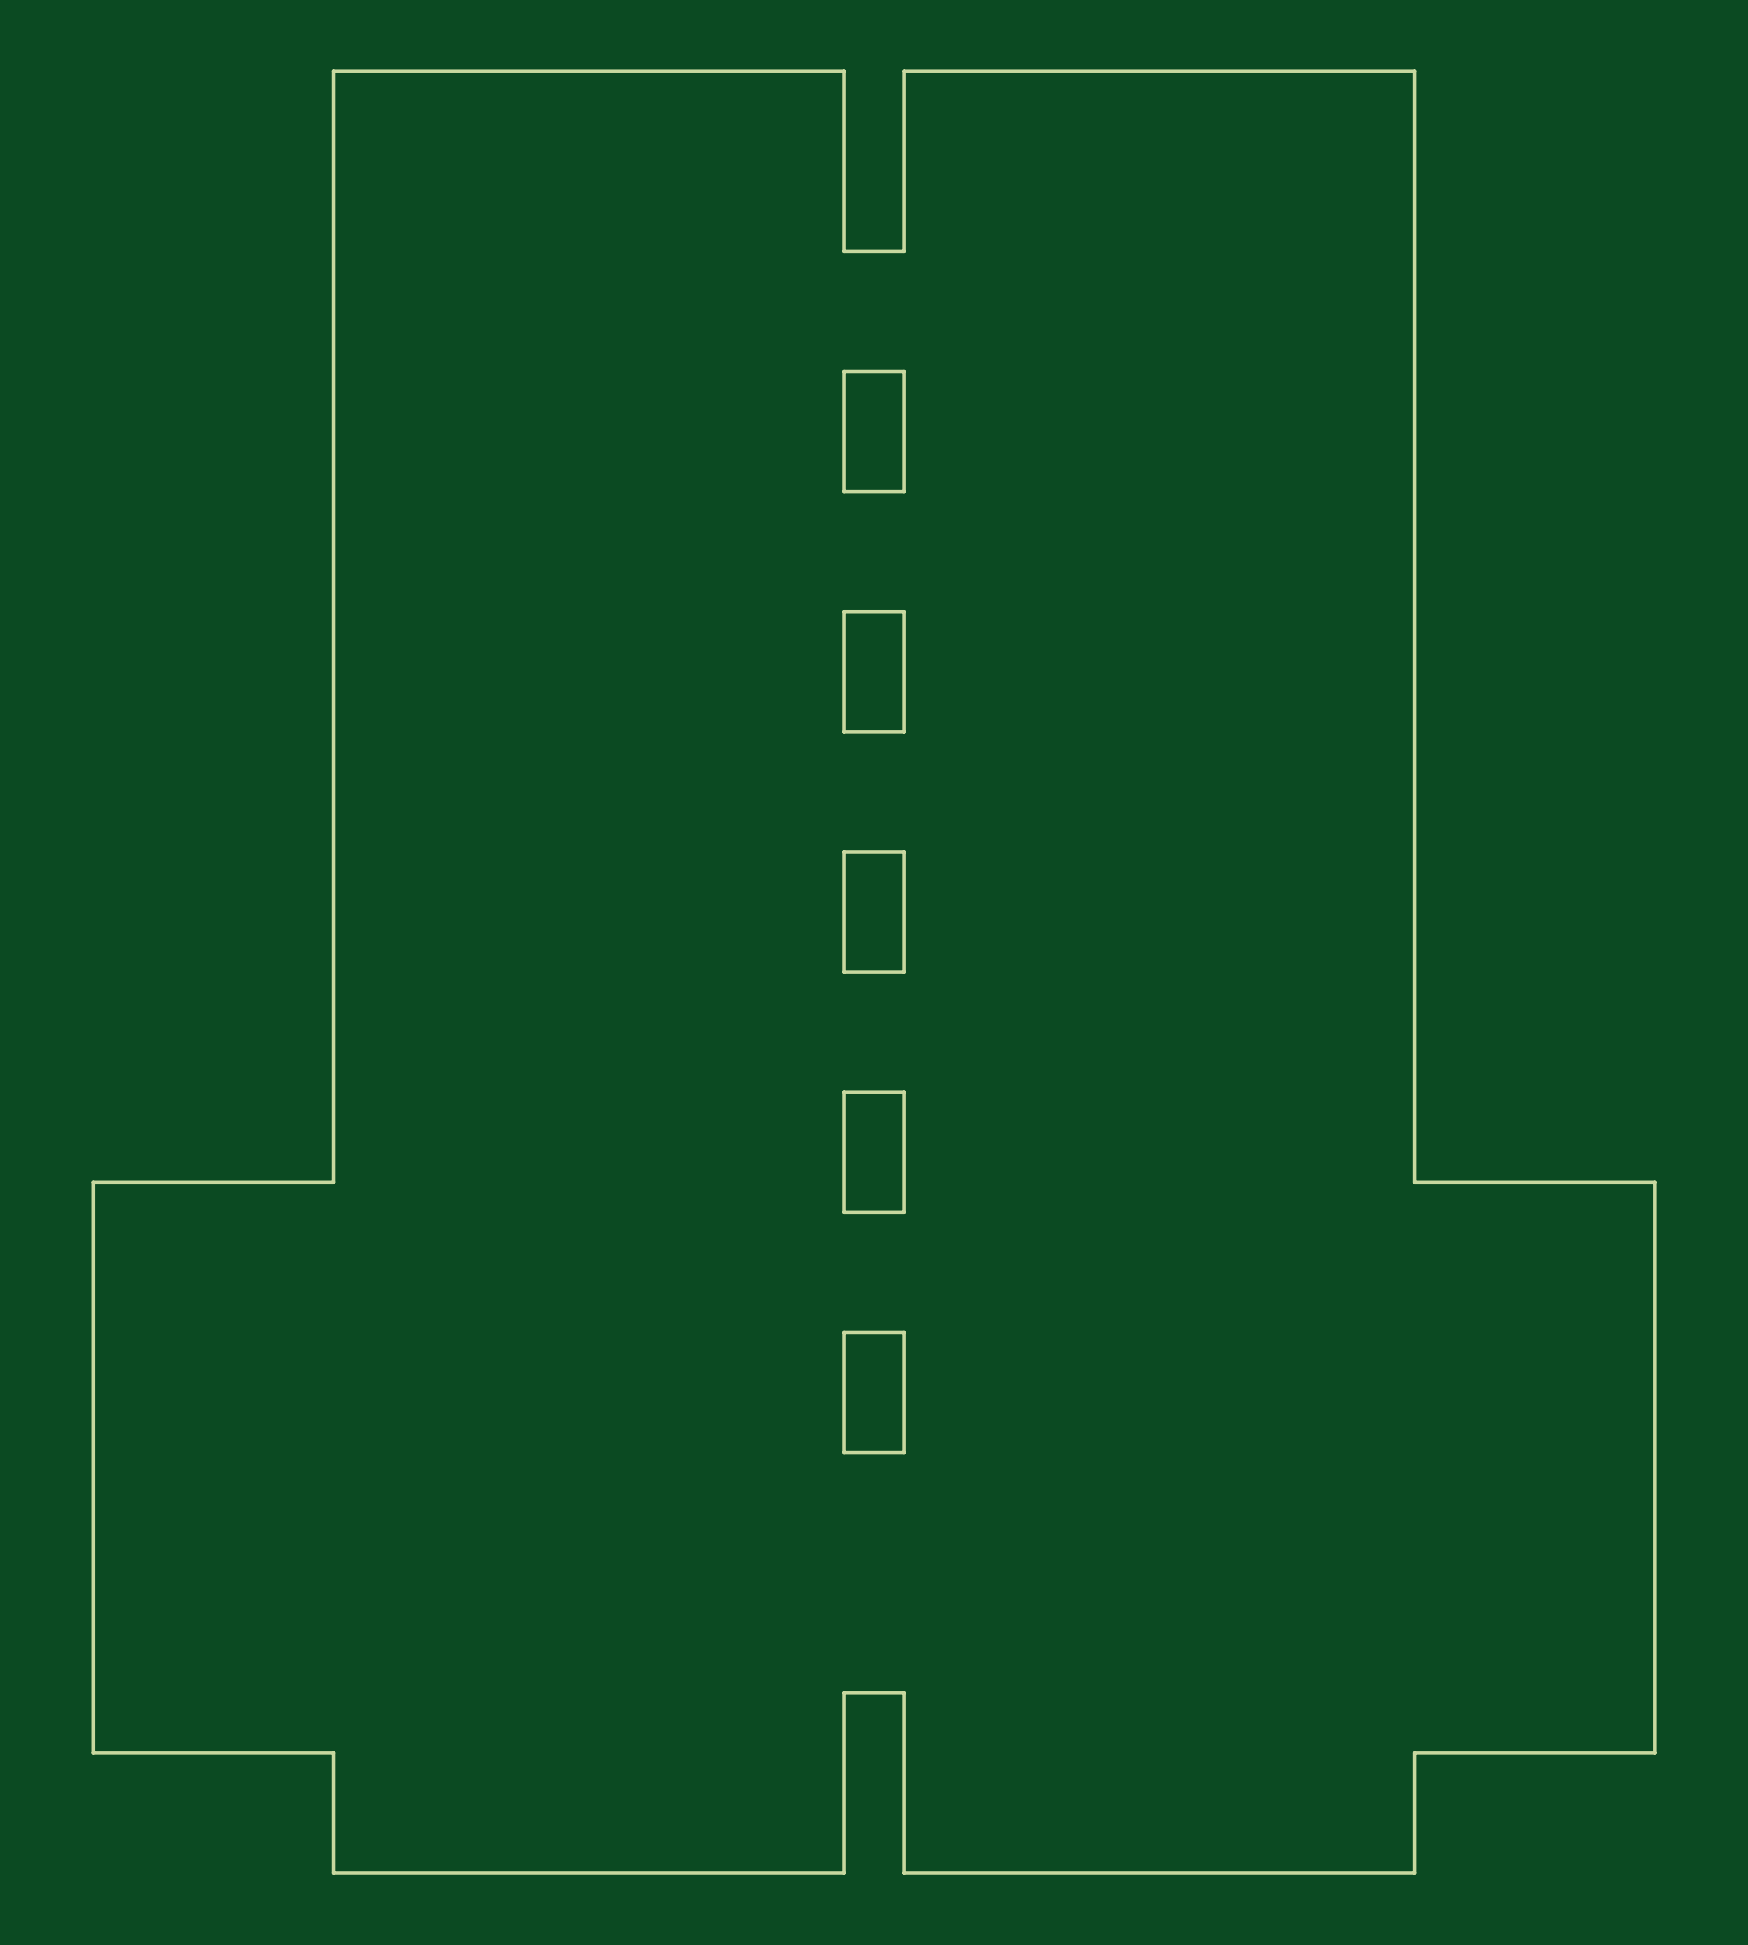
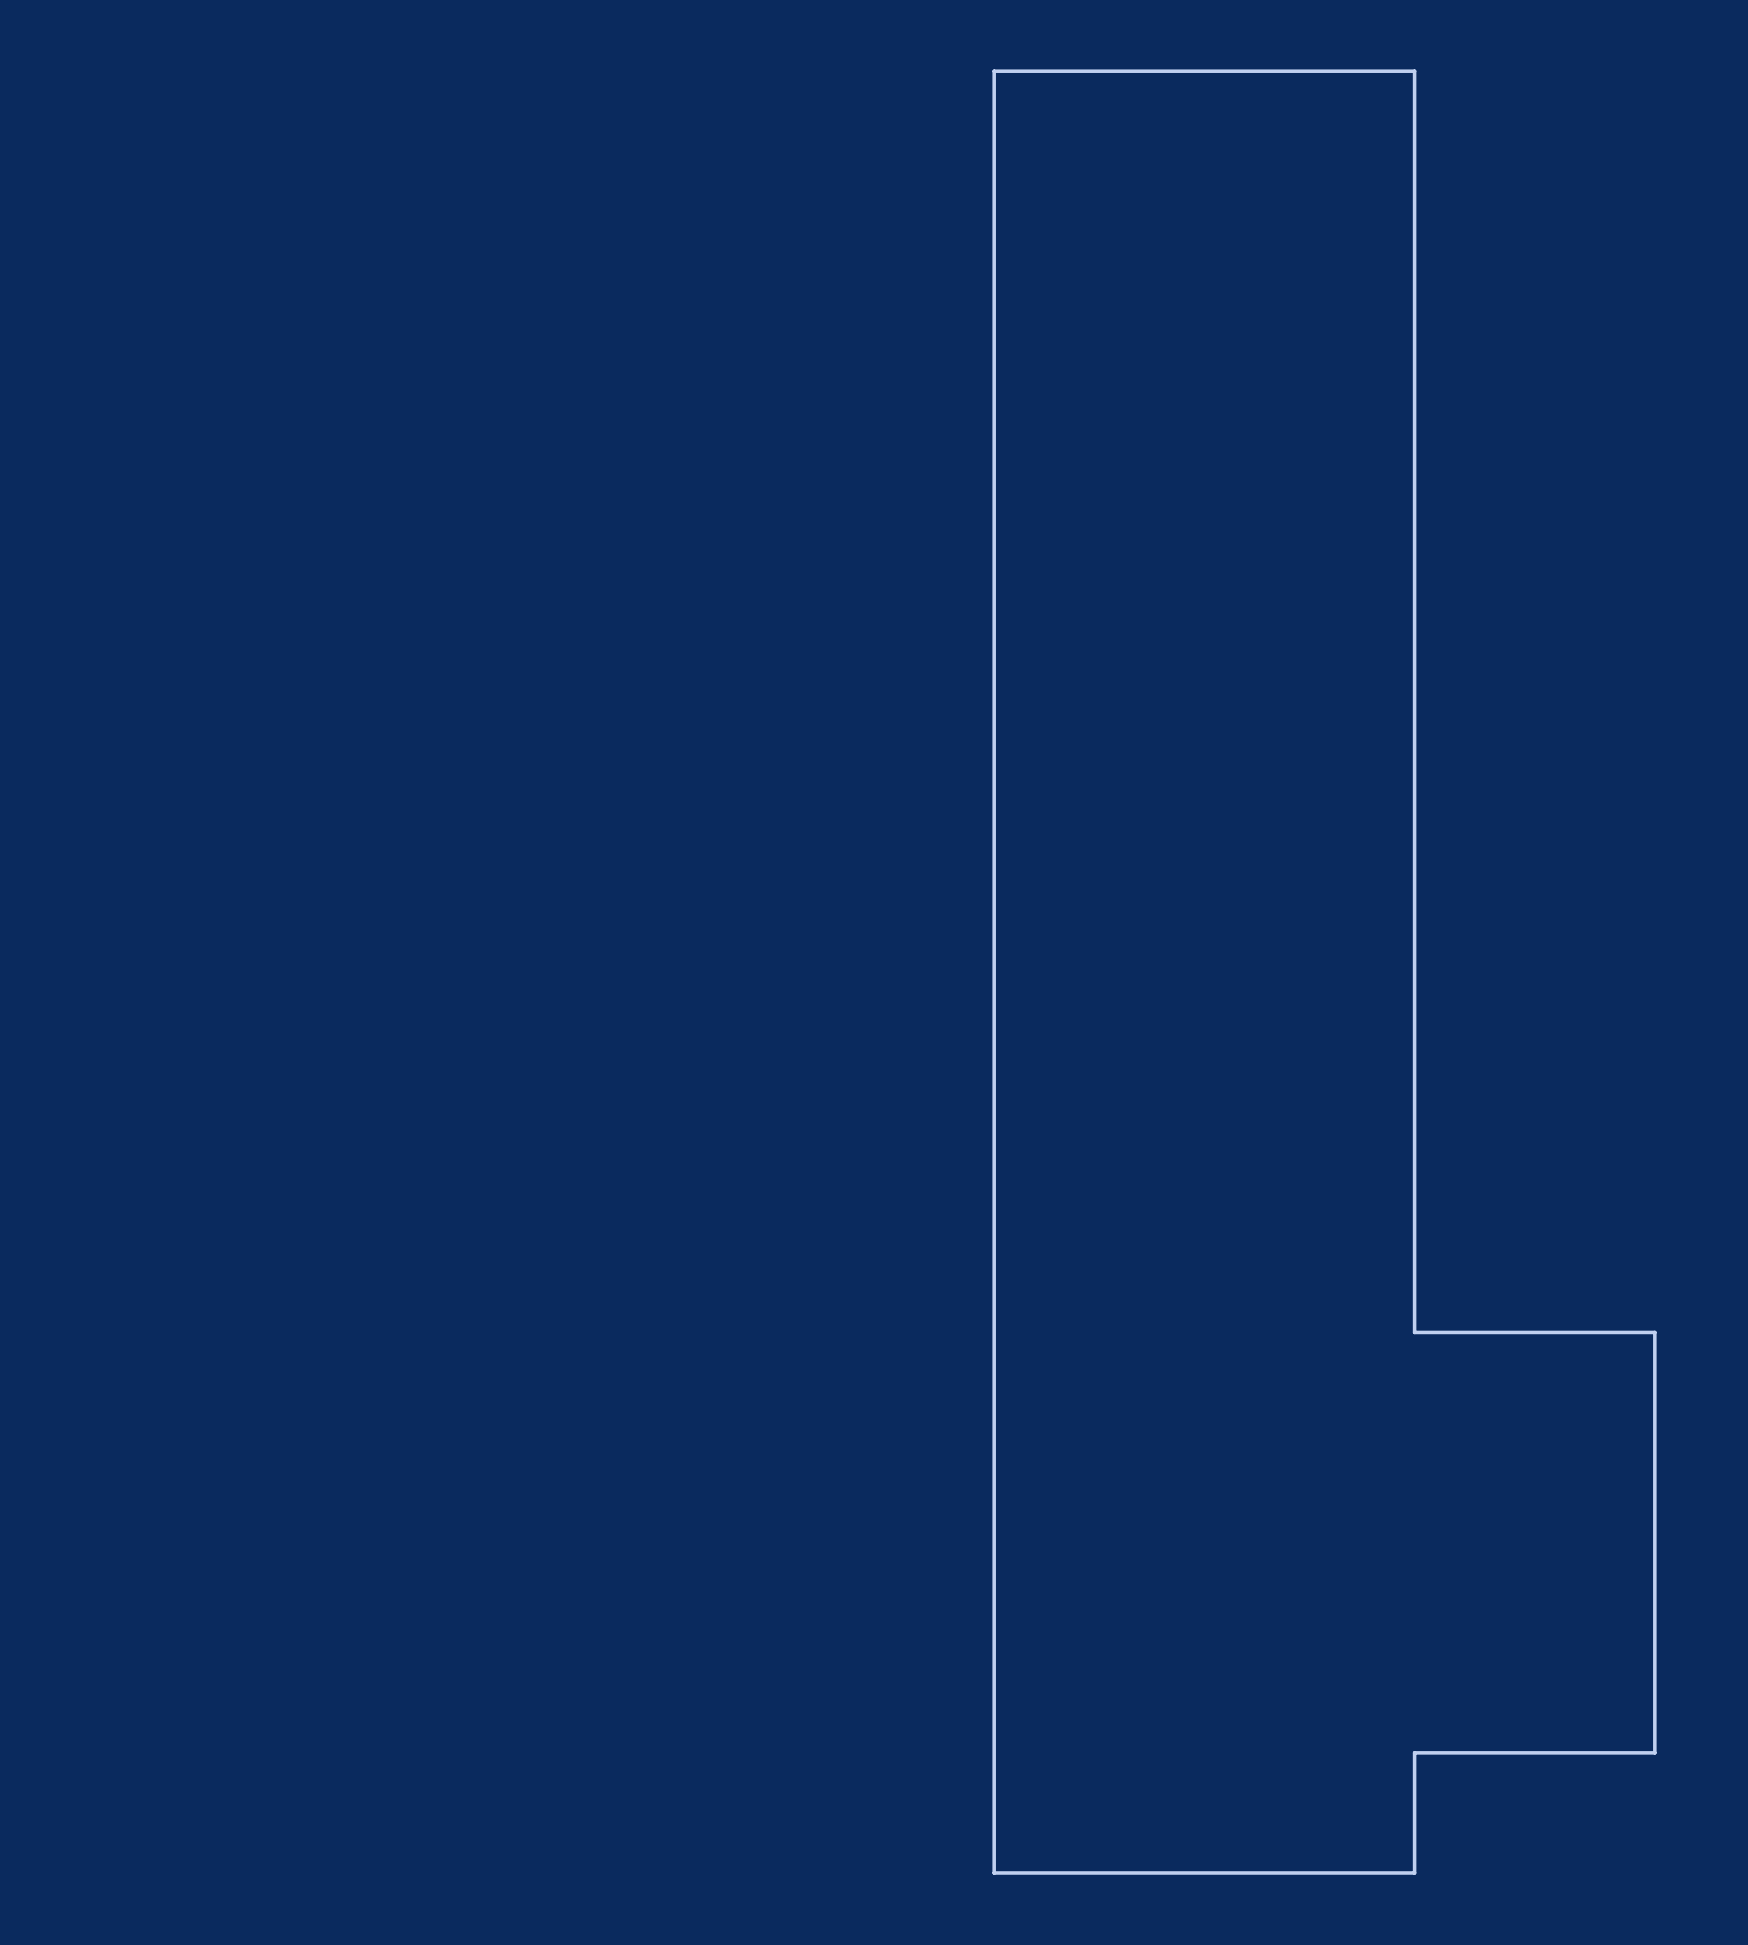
board edge: (904, 71) (904, 251) (844, 251) (844, 71) (333, 71) (333, 1182) (93, 1182) (93, 1752) (333, 1752) (333, 1872) (844, 1872) (844, 1692) (904, 1692) (904, 1872) (994, 1872) -> (994, 71) (994, 1872)
board edge: (994, 71) (904, 71) -> none
board edge: (904, 371) (904, 491) (844, 491) (844, 371) (904, 371) -> none
board edge: (904, 611) (904, 731) (844, 731) (844, 611) (904, 611) -> none
board edge: (904, 851) (904, 972) (844, 972) (844, 851) (904, 851) -> none
board edge: (904, 1092) (904, 1212) (844, 1212) (844, 1092) (904, 1092) -> none
board edge: (1414, 1182) (1654, 1182) (1654, 1332) -> (1414, 1182) (1414, 1332) (1654, 1332)
board edge: (904, 1332) (904, 1452) (844, 1452) (844, 1332) (904, 1332) -> none

